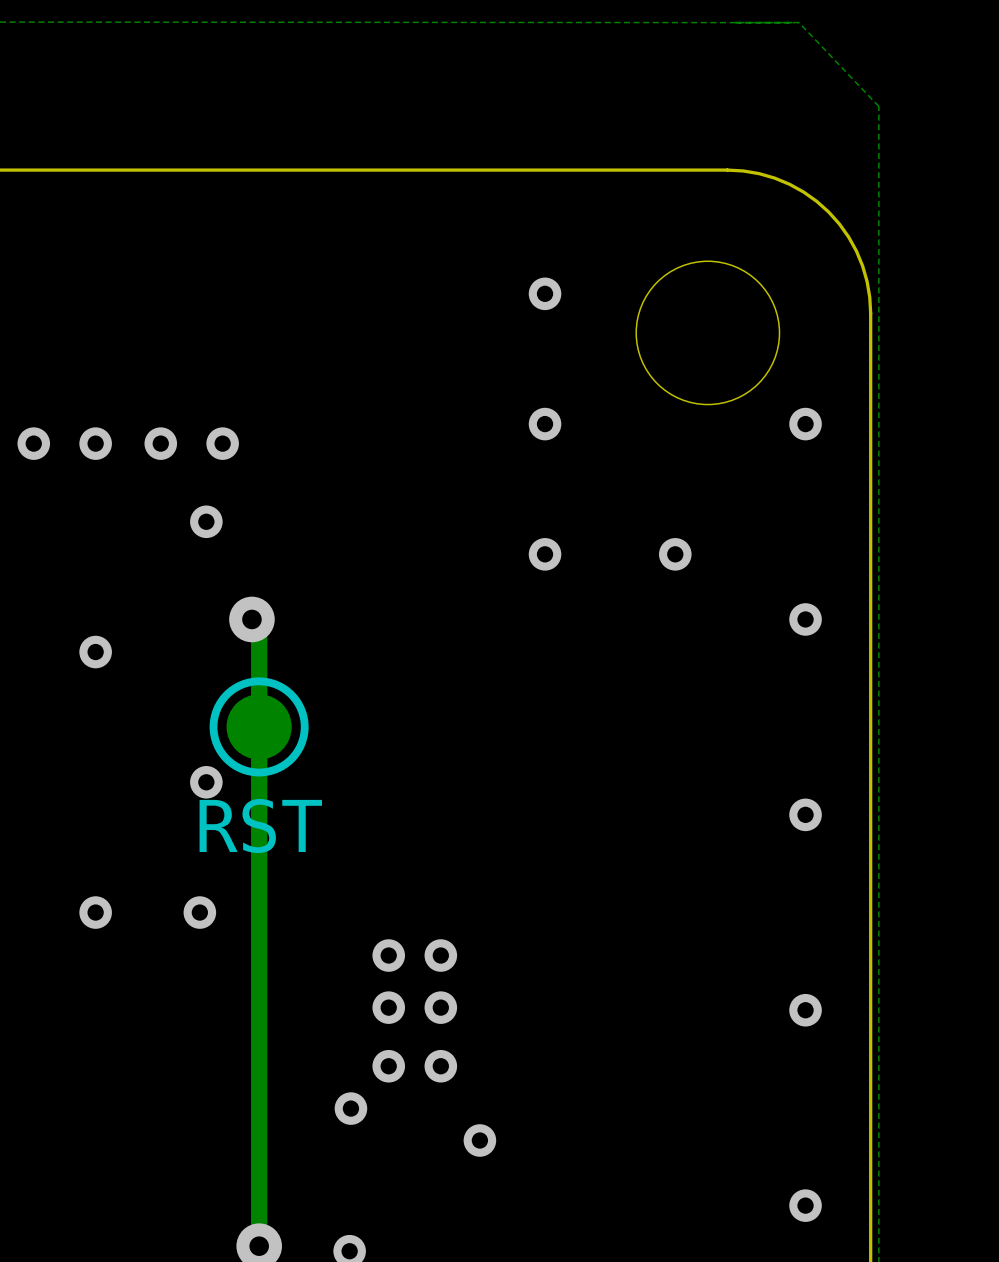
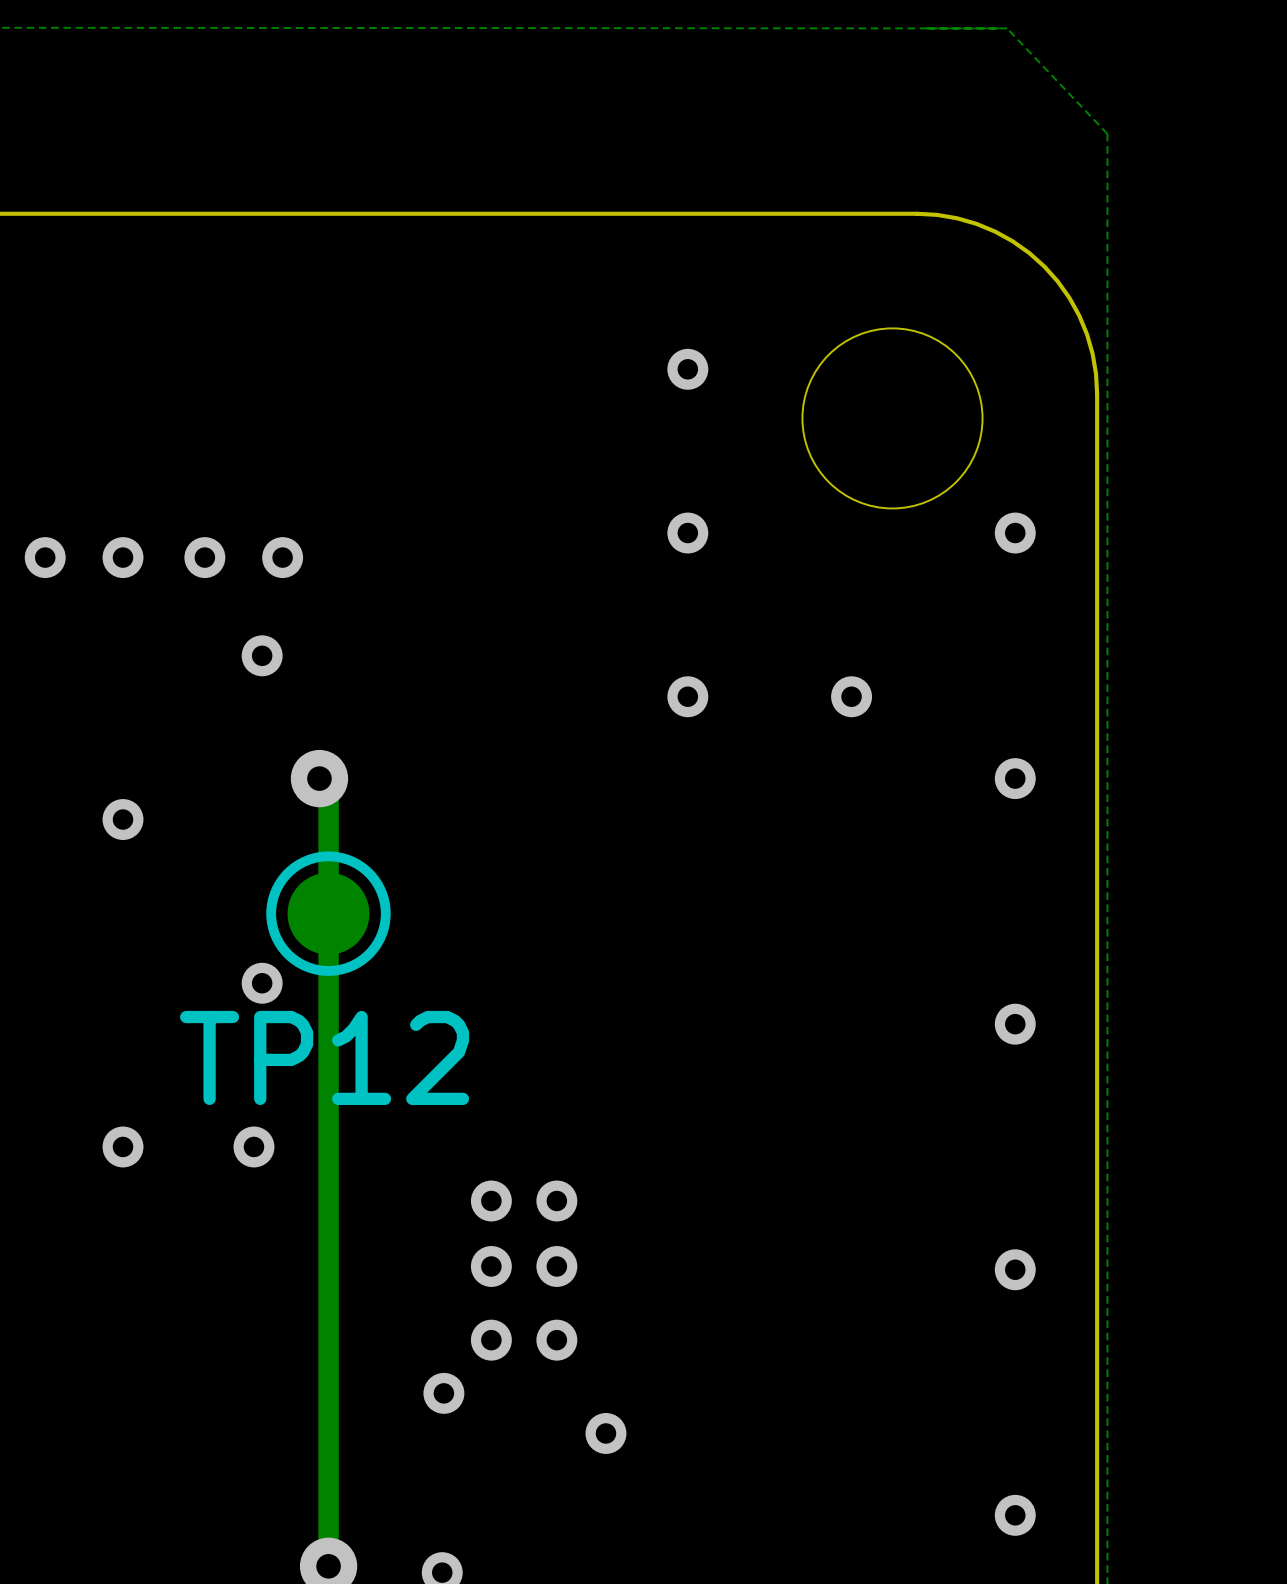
TP12 value: RST (260, 825) -> none
TP12 name: none -> TP12 (324, 1057)

